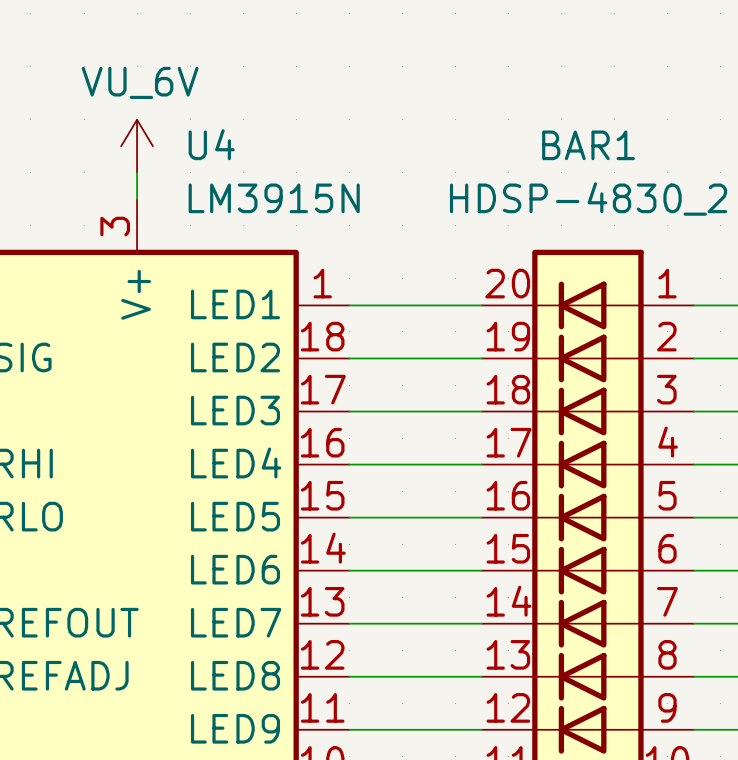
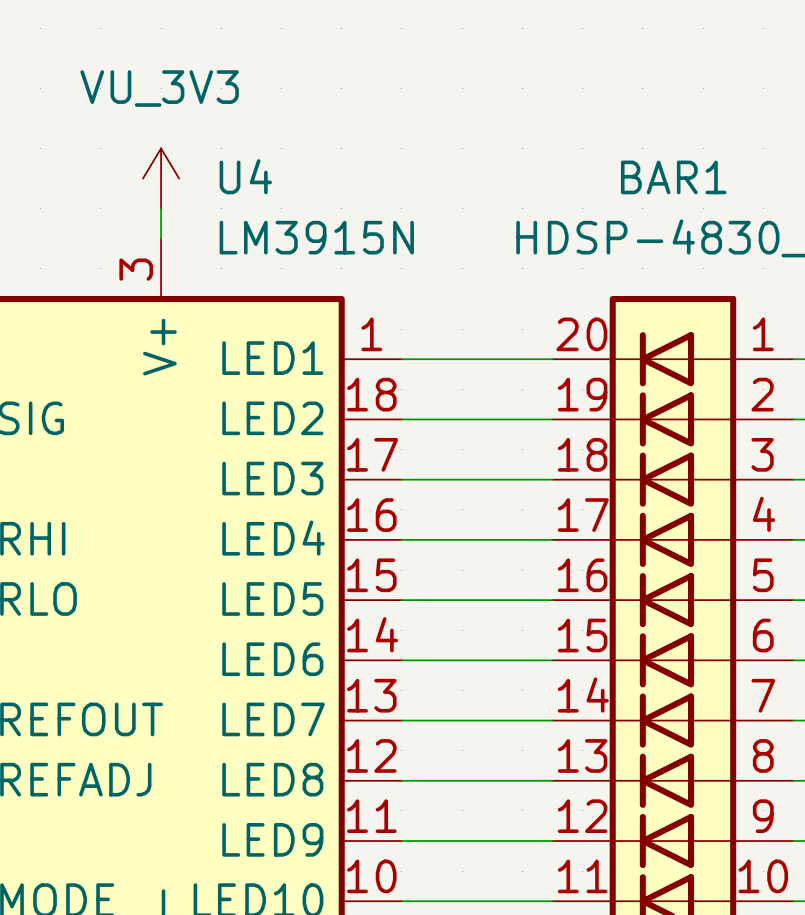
power symbol: VU_6V (137, 146) -> VU_3V3 (161, 178)

